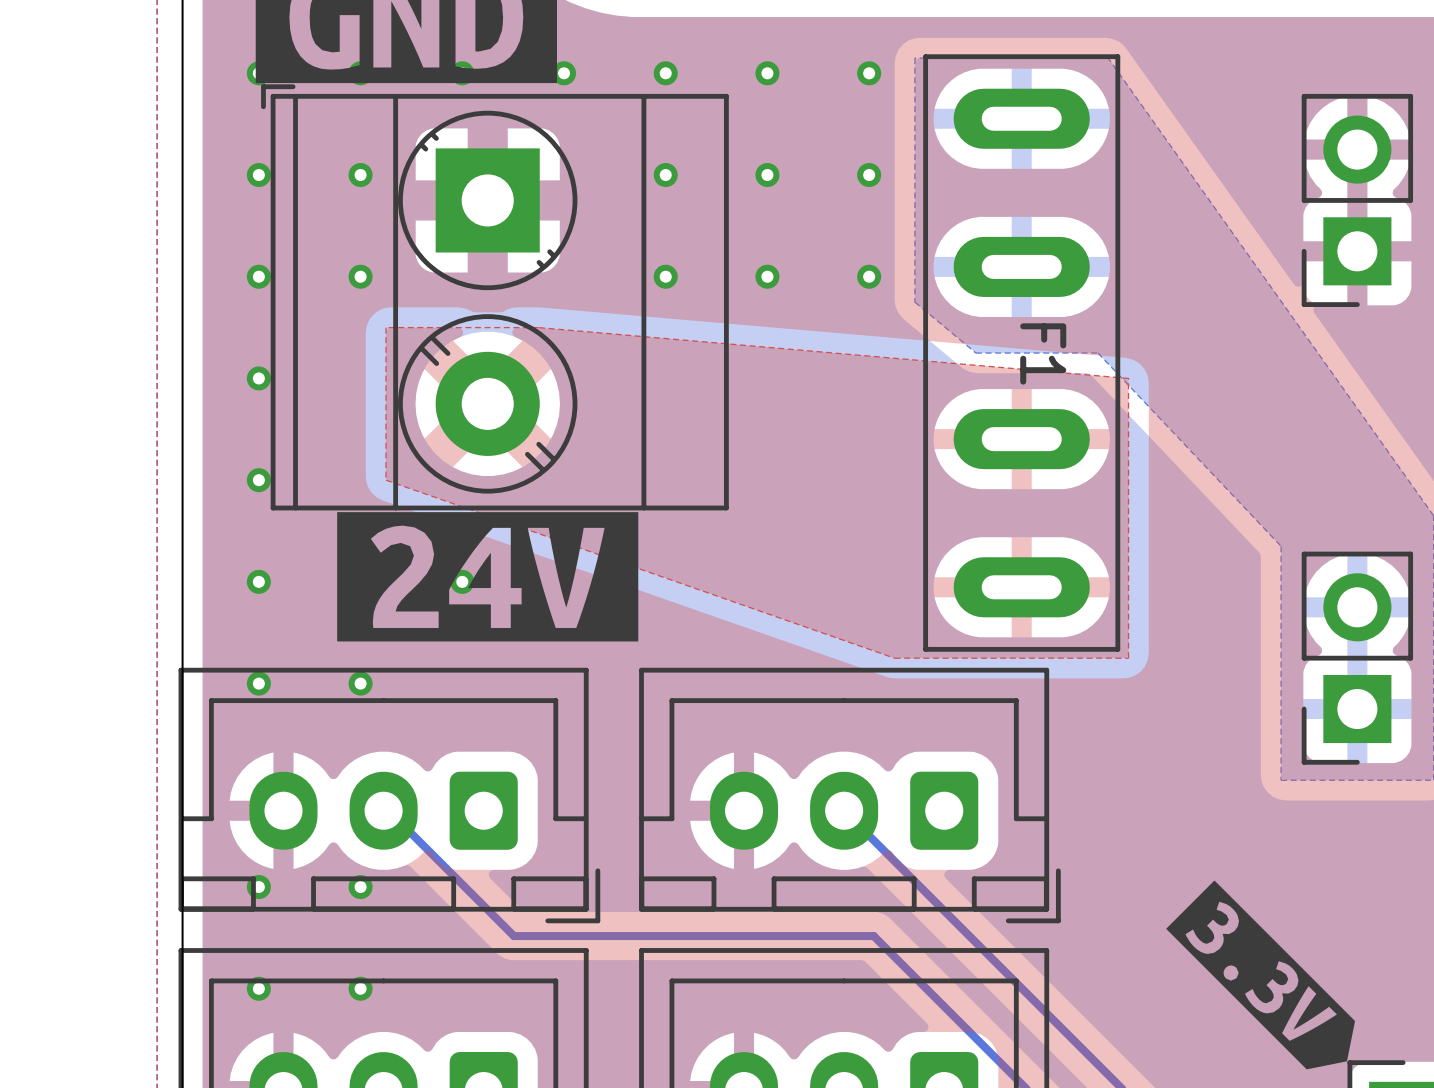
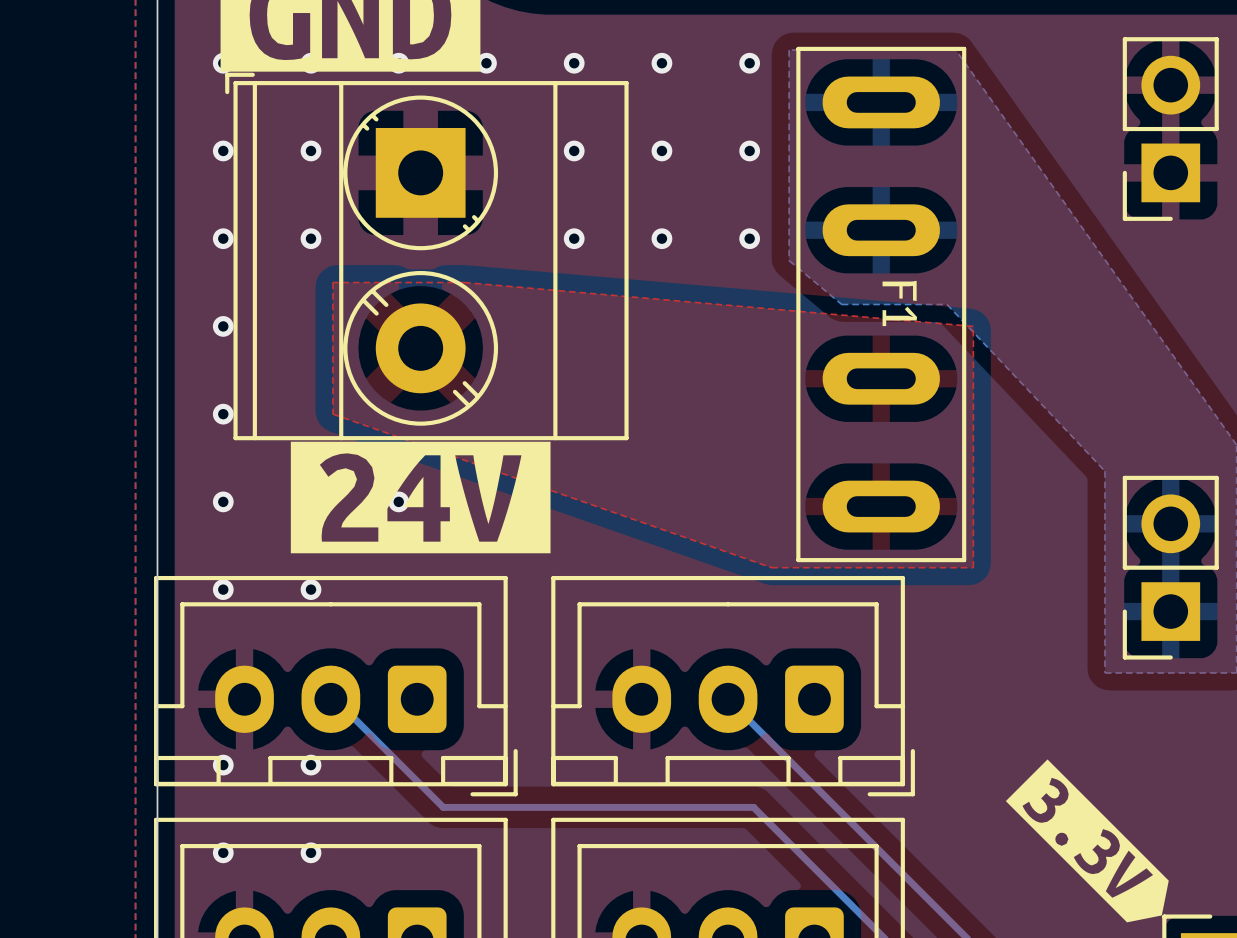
part position: (1357, 200) -> (1170, 129)

